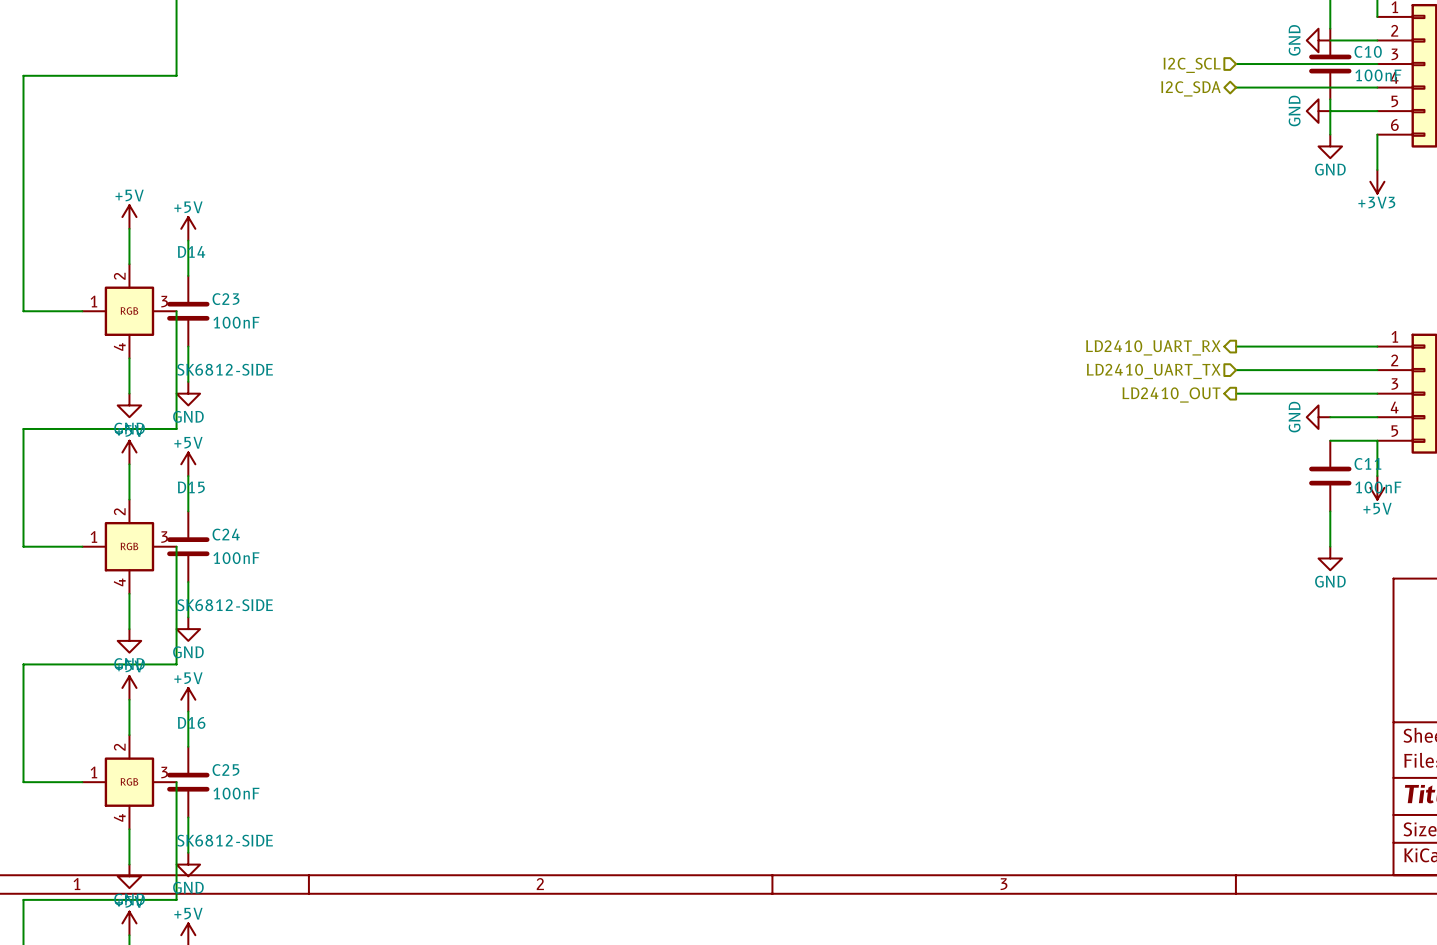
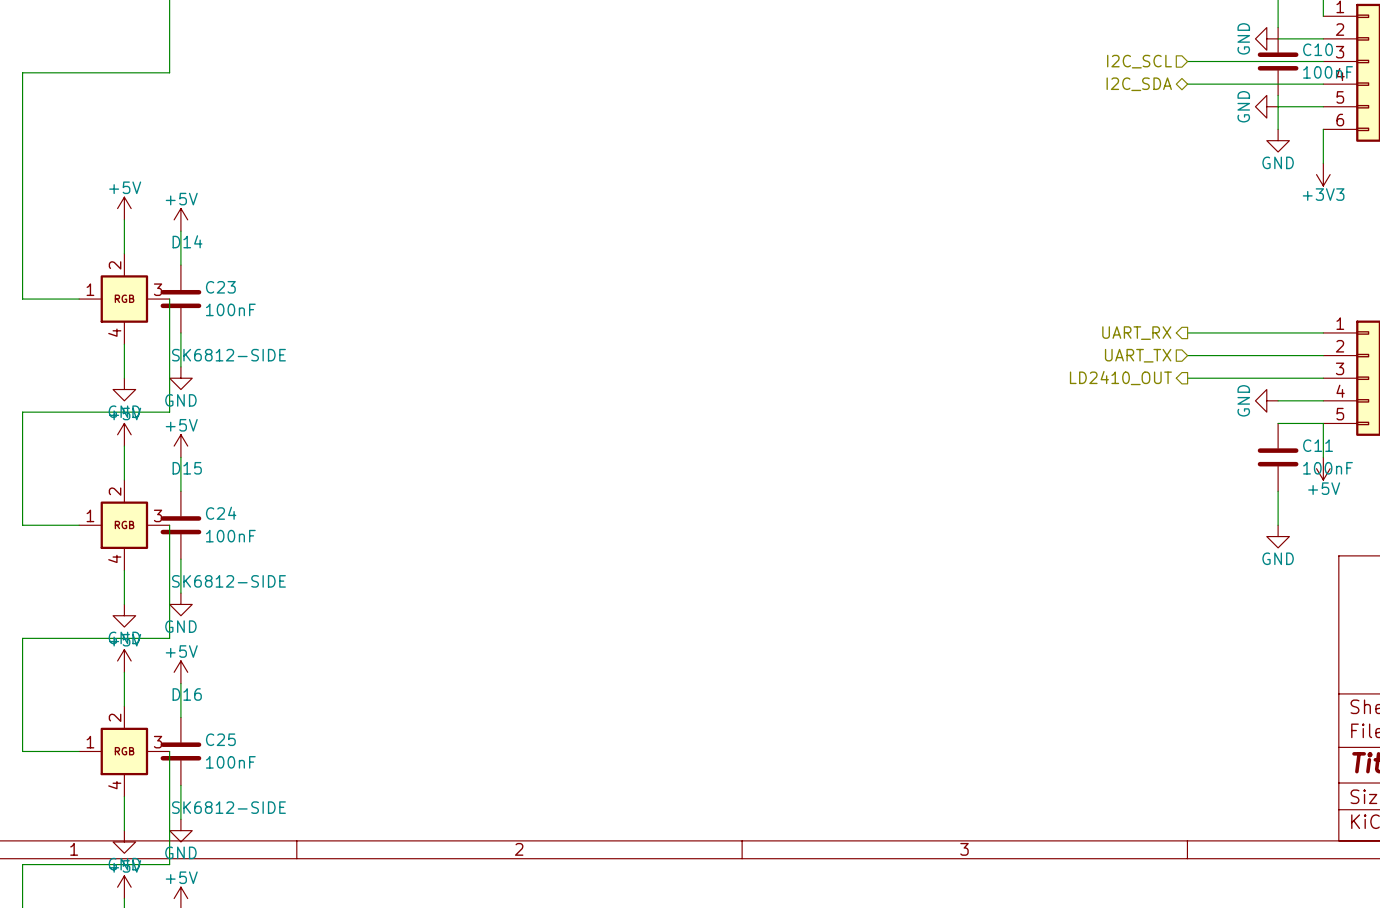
hierarchical label: LD2410_UART_RX (1153, 347) -> UART_RX (1136, 333)
hierarchical label: LD2410_UART_TX (1153, 371) -> UART_TX (1138, 355)

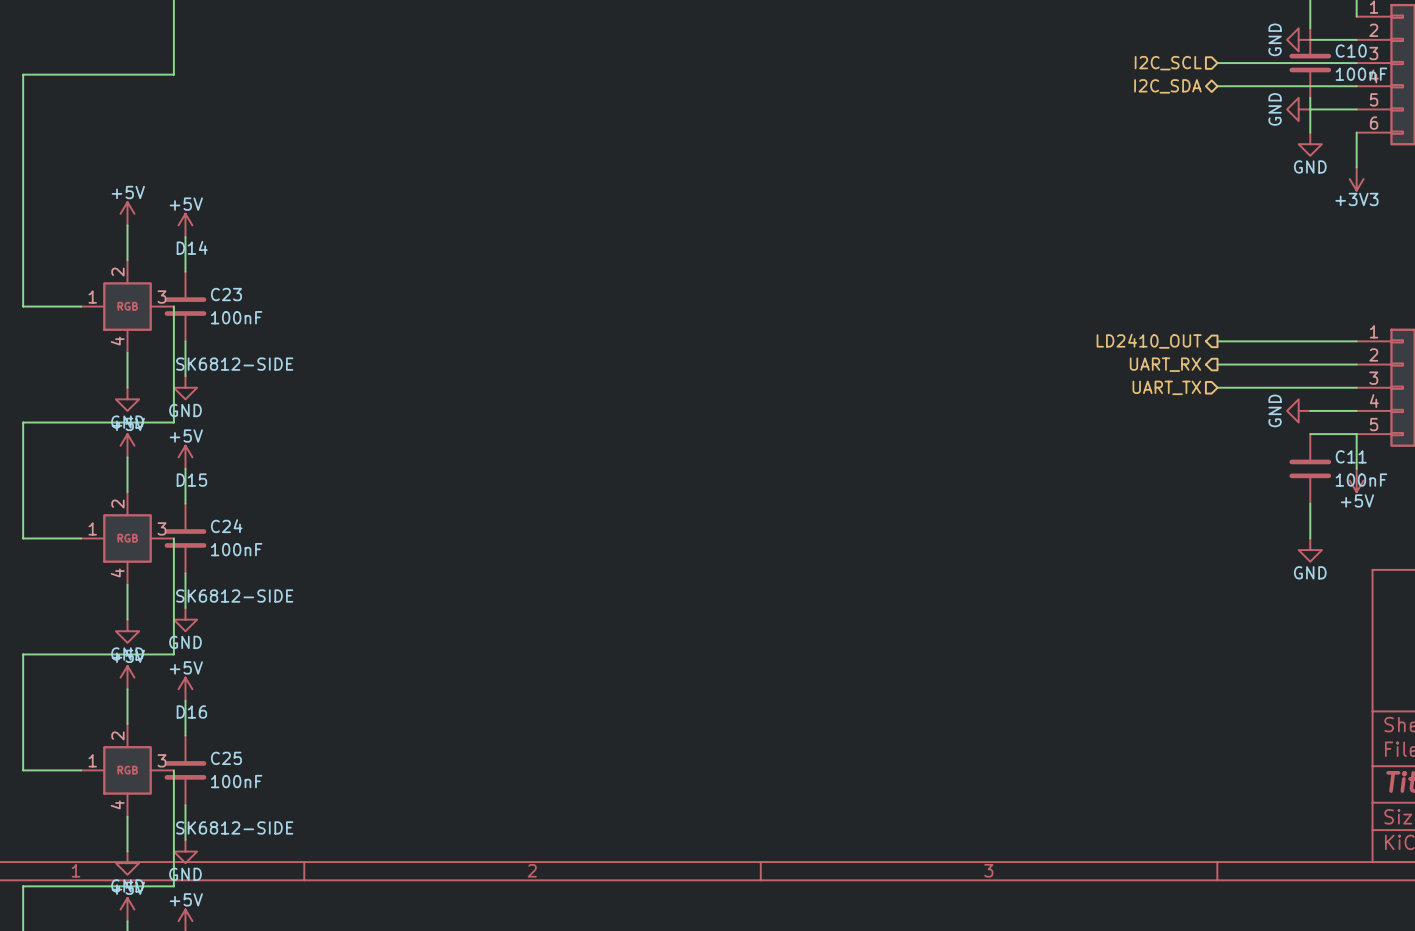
hierarchical label: UART_RX (1136, 333) -> LD2410_OUT (1149, 341)
hierarchical label shape: input (1138, 355) -> output (1165, 364)
hierarchical label: UART_TX (1138, 355) -> UART_RX (1165, 364)
hierarchical label shape: output (1120, 378) -> input (1166, 387)
hierarchical label: LD2410_OUT (1120, 378) -> UART_TX (1166, 387)

